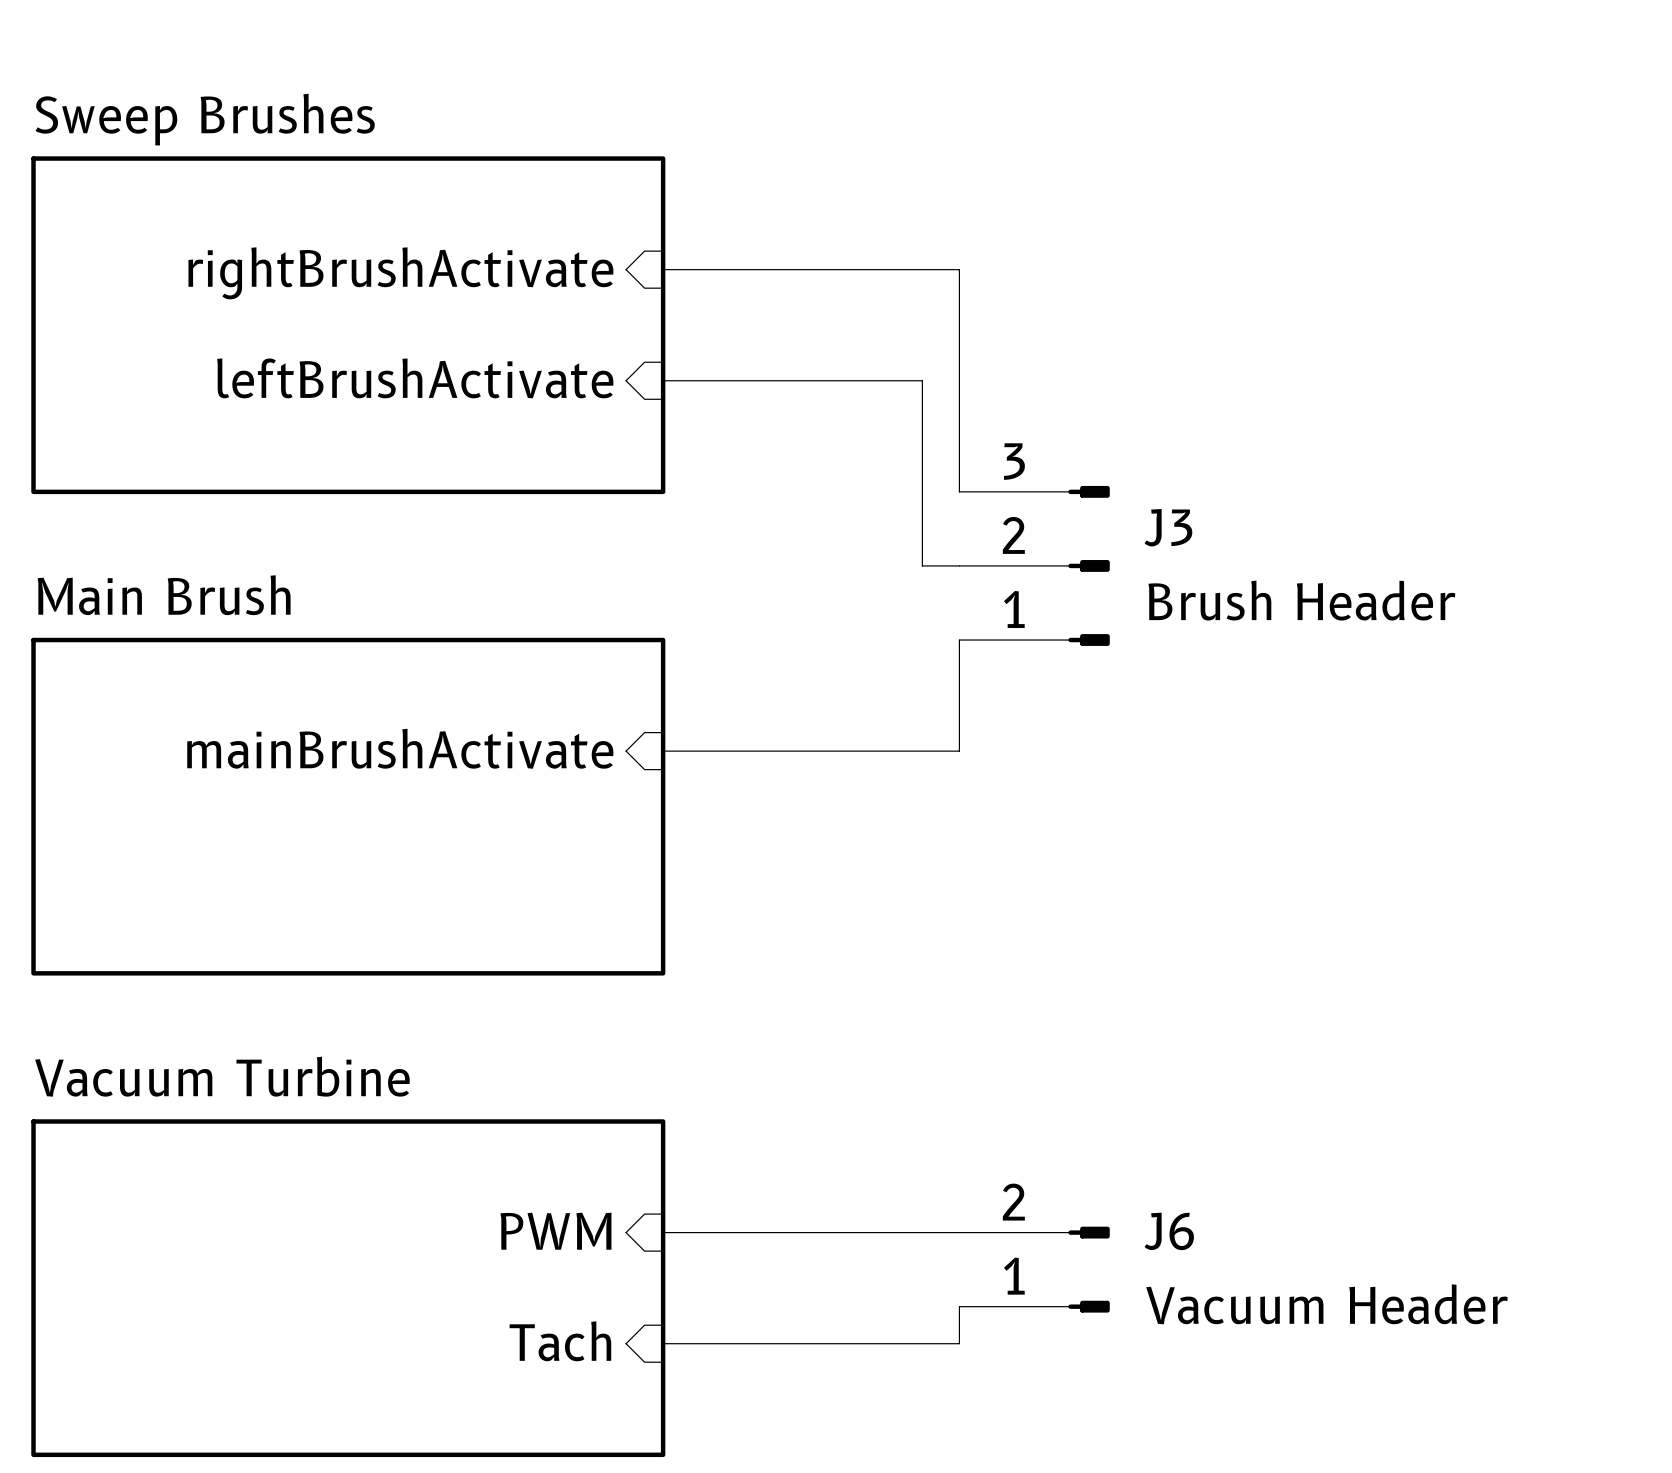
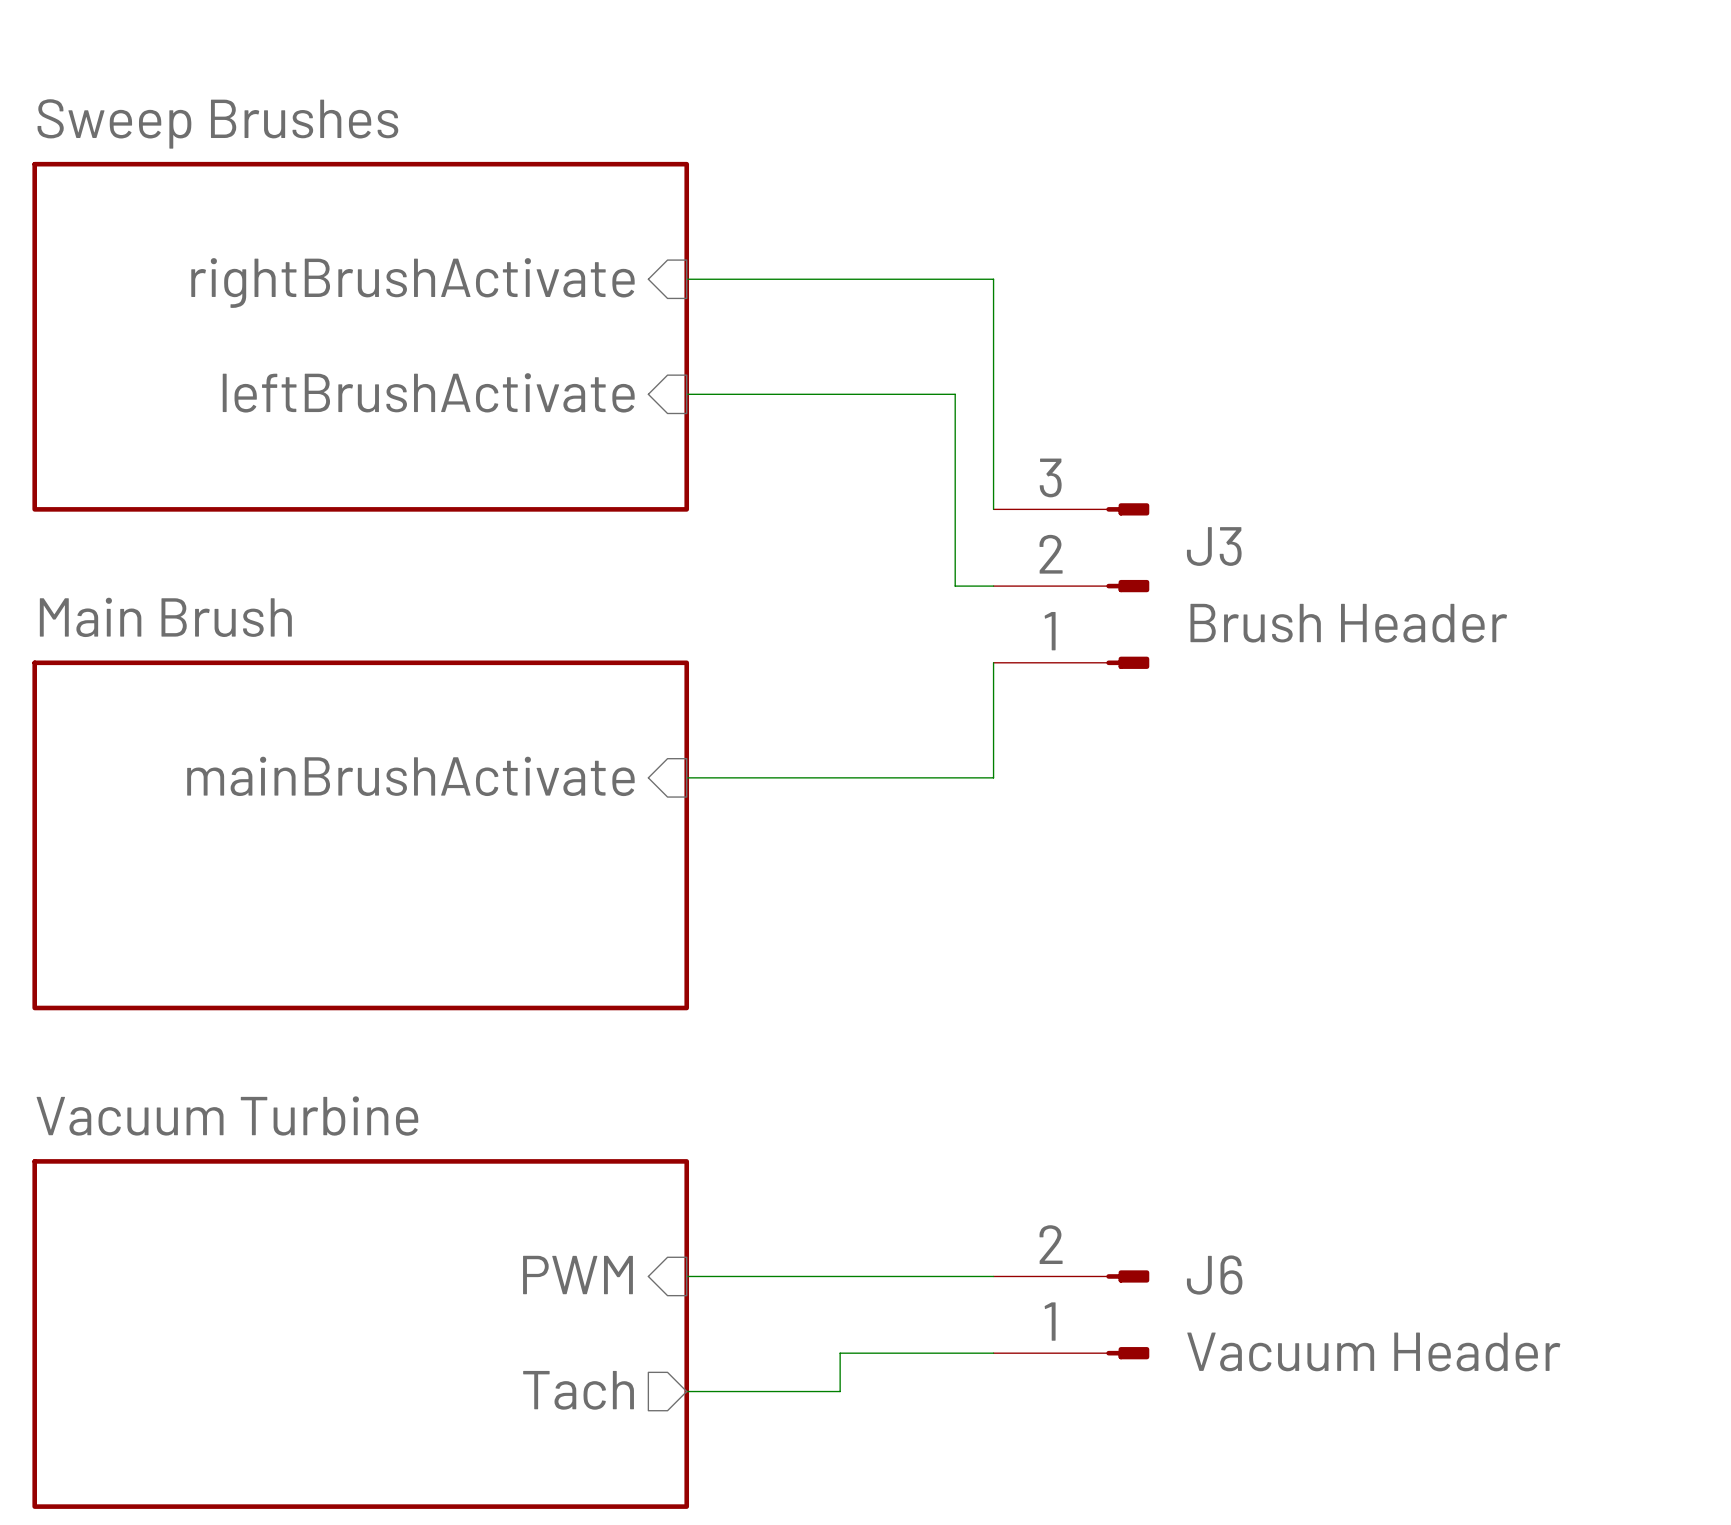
wire: (959, 1306) (959, 1343) (811, 1343) -> (993, 1353) (840, 1353) (840, 1391)
sheet pin shape: input (560, 1341) -> output (578, 1390)

